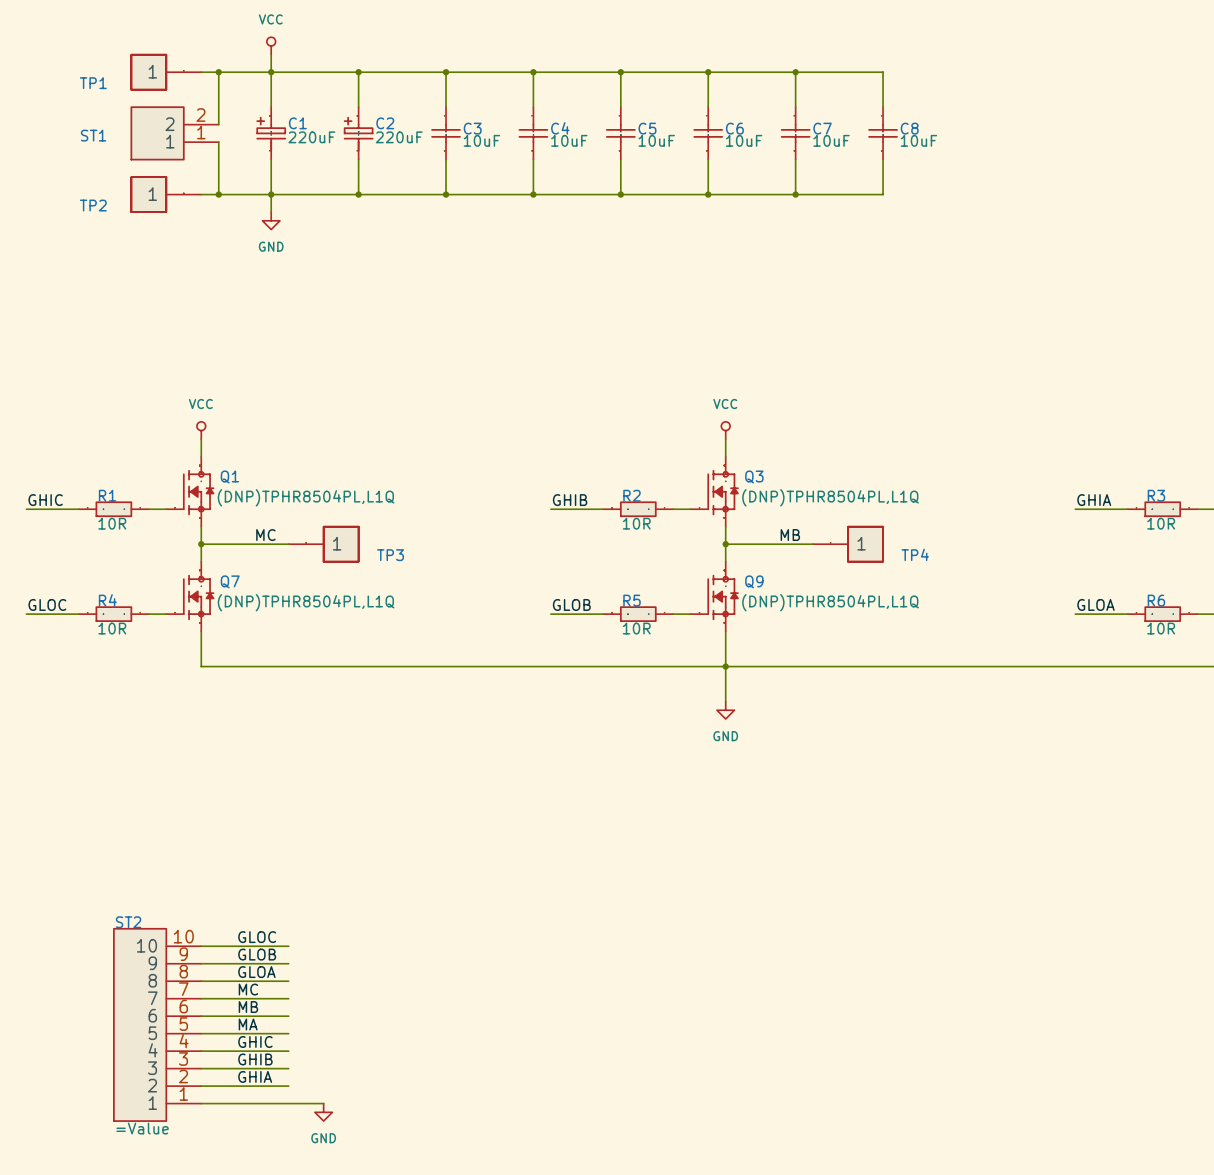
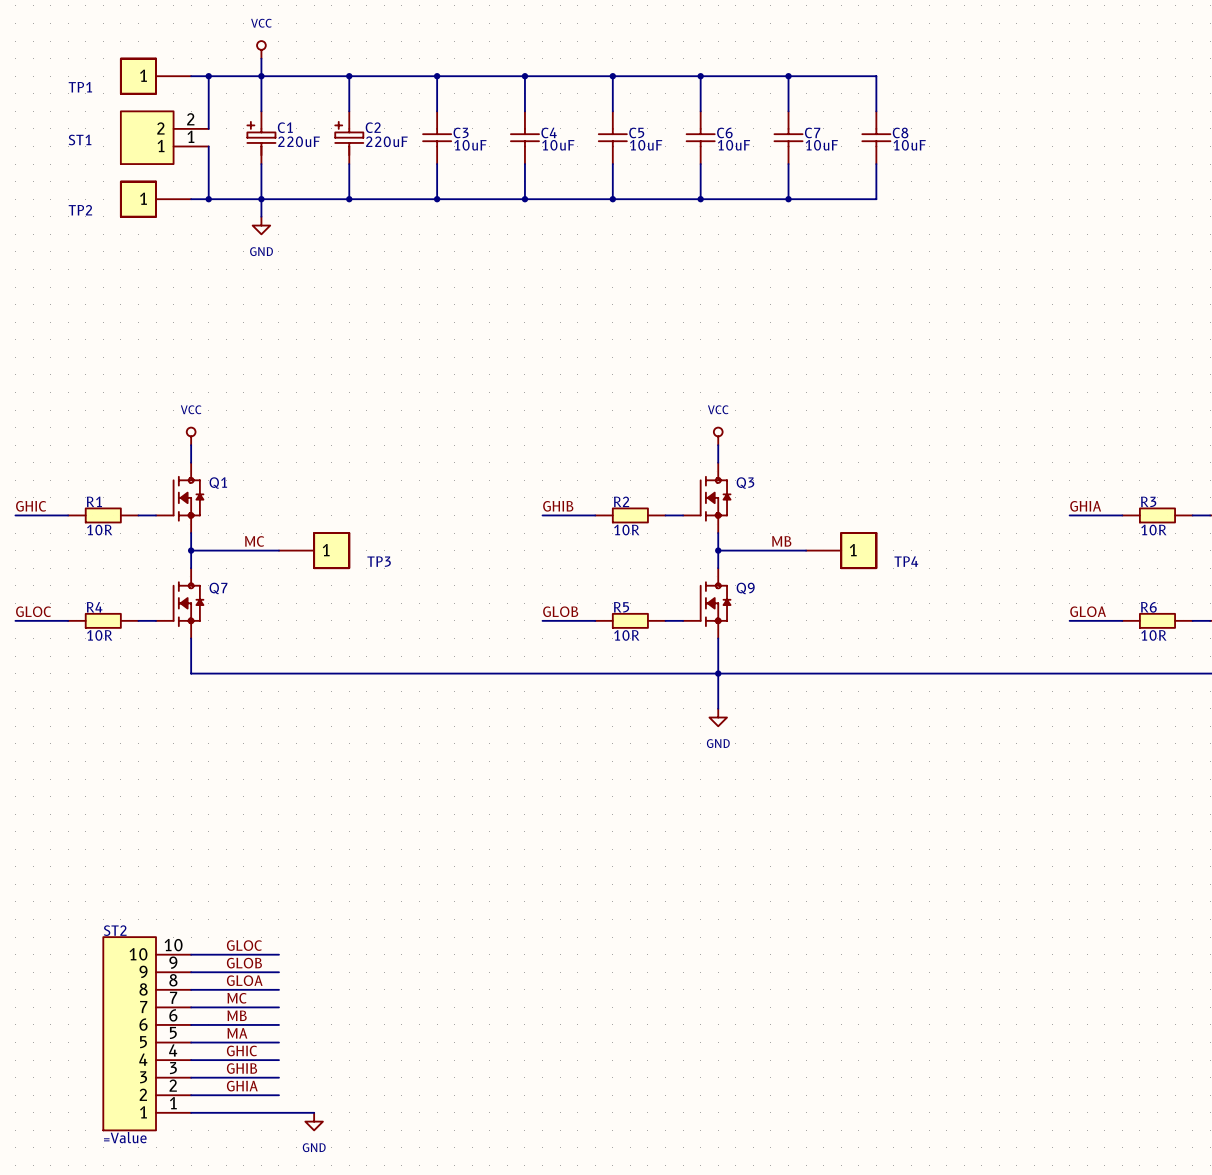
Q1 value: (DNP)TPHR8504PL,L1Q (306, 497) -> none
Q3 value: (DNP)TPHR8504PL,L1Q (830, 497) -> none
Q7 value: (DNP)TPHR8504PL,L1Q (306, 602) -> none
Q9 value: (DNP)TPHR8504PL,L1Q (830, 602) -> none

